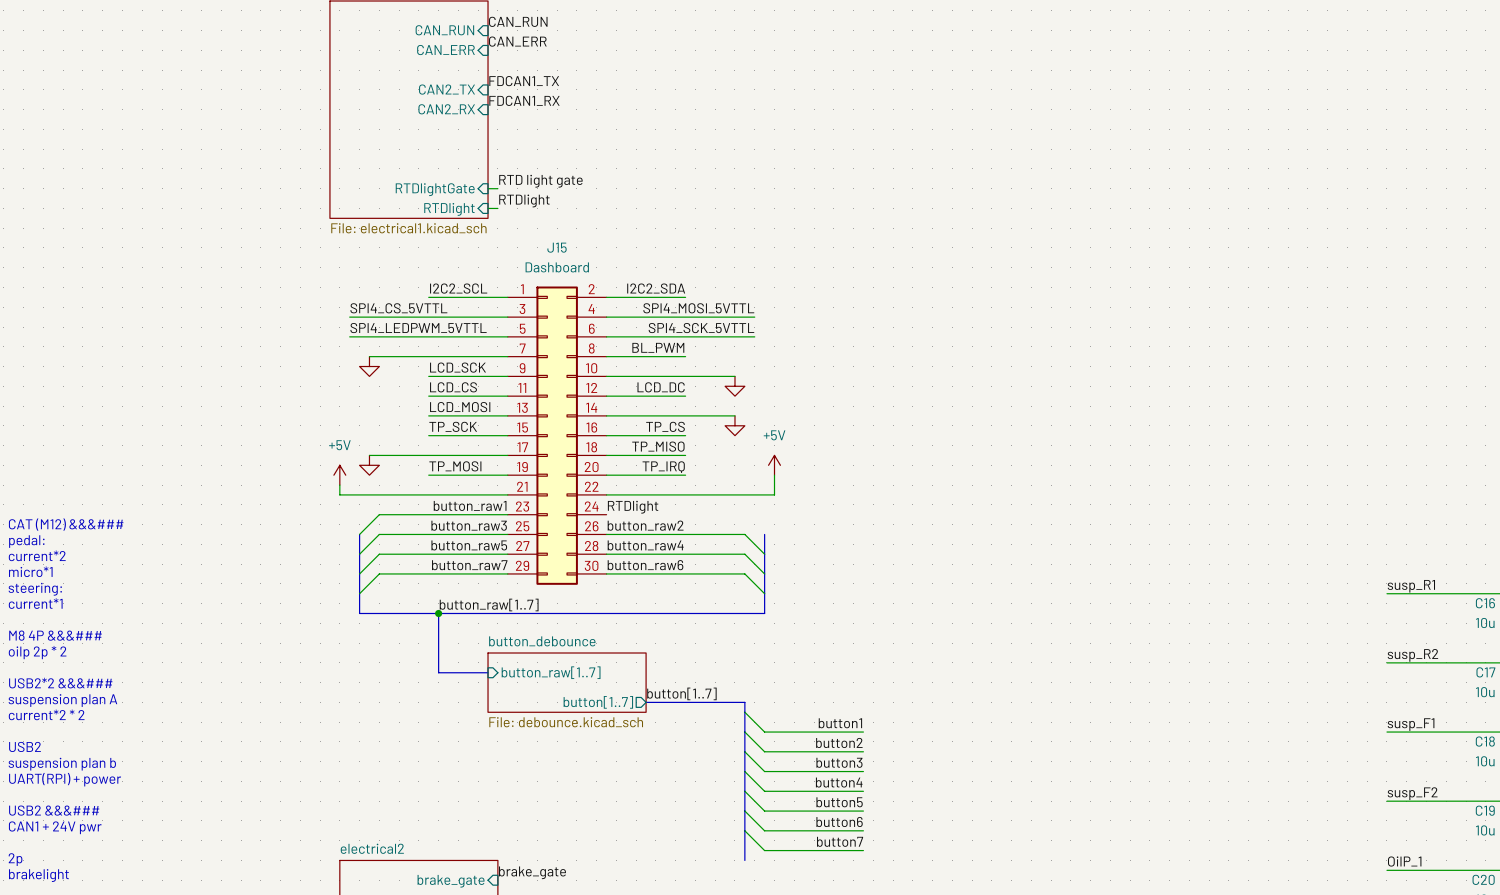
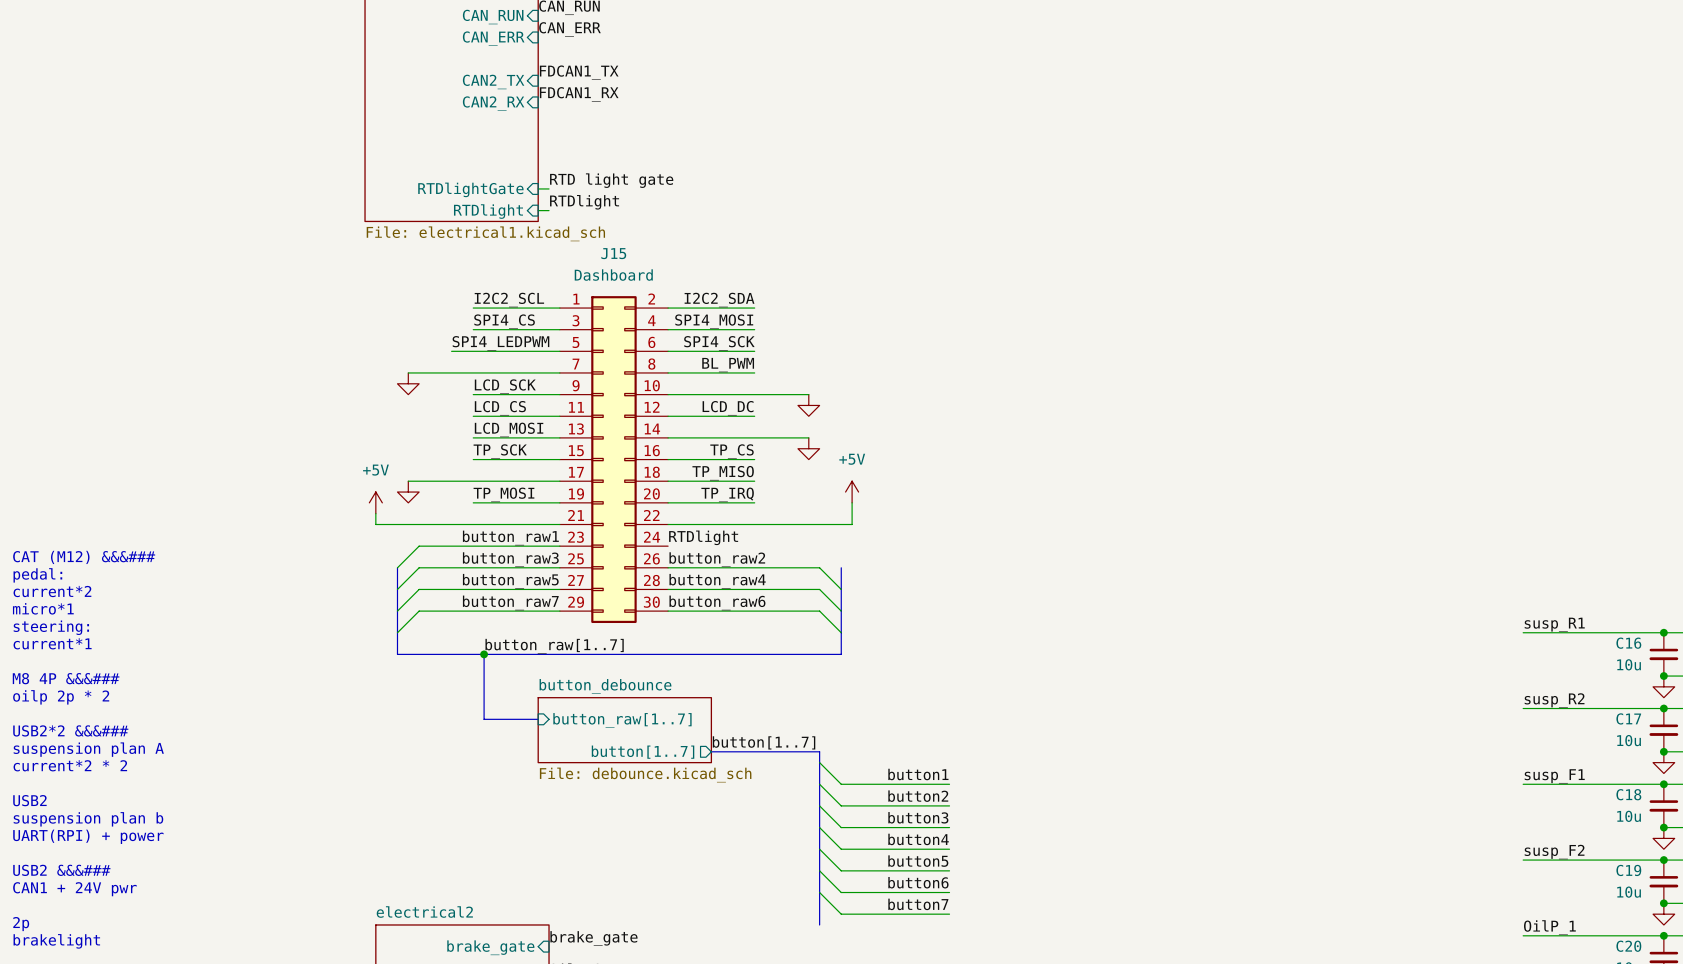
label: SPI4_CS_5VTTL (398, 308) -> SPI4_CS (504, 321)
label: SPI4_MOSI_5VTTL (698, 308) -> SPI4_MOSI (714, 321)
wire: (349, 317) (428, 317) -> none
wire: (685, 317) (754, 317) -> none
label: SPI4_LEDPWM_5VTTL (418, 328) -> SPI4_LEDPWM (500, 343)
label: SPI4_SCK_5VTTL (701, 328) -> SPI4_SCK (719, 343)
wire: (349, 336) (408, 336) -> none
wire: (685, 336) (754, 336) -> none

